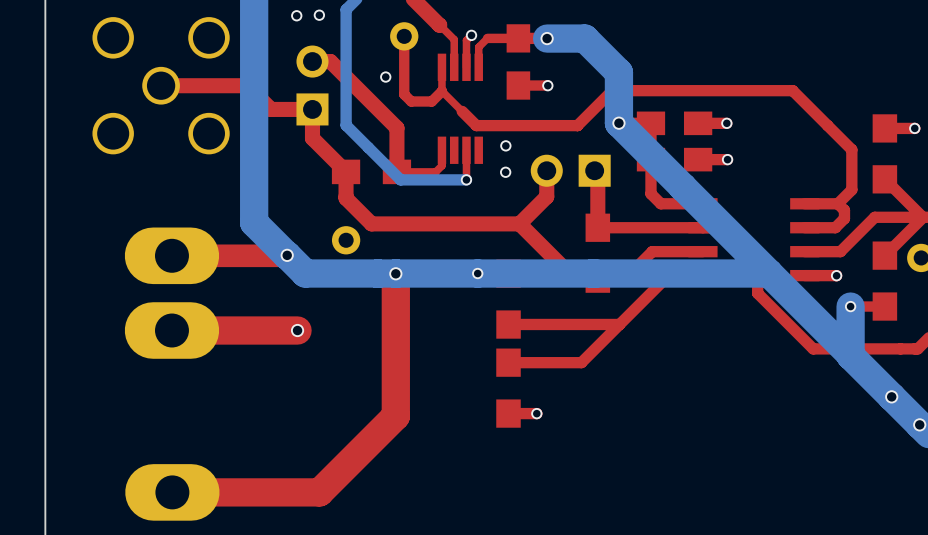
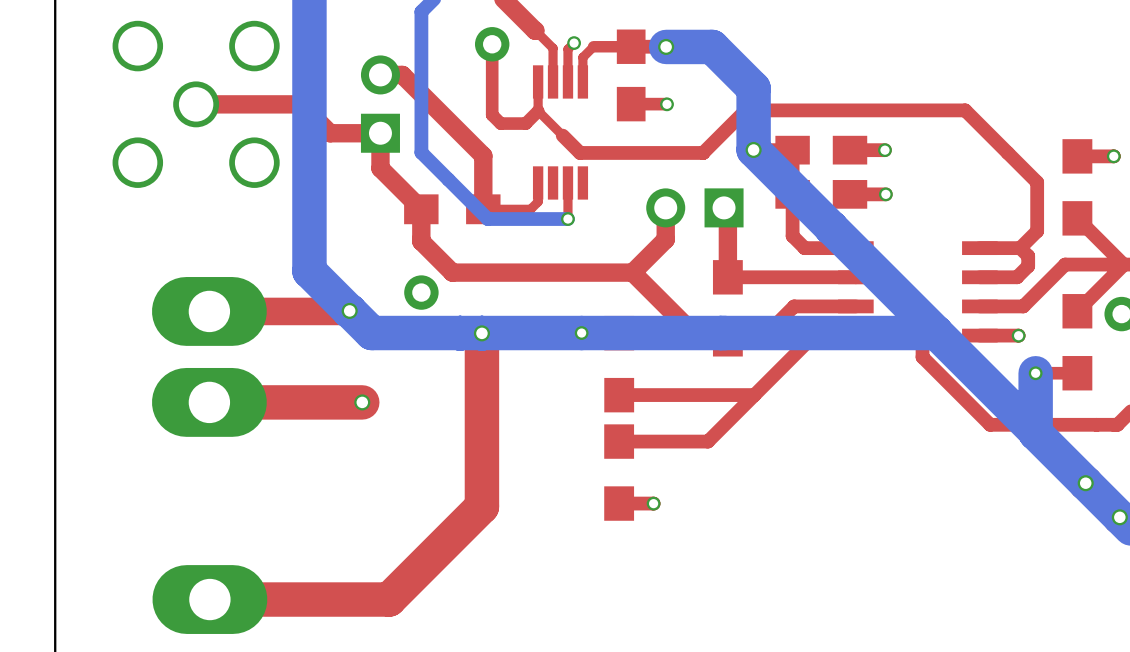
via: (296, 15) -> none
via: (319, 15) -> none
via: (385, 77) -> none
via: (505, 145) -> none
via: (505, 172) -> none

